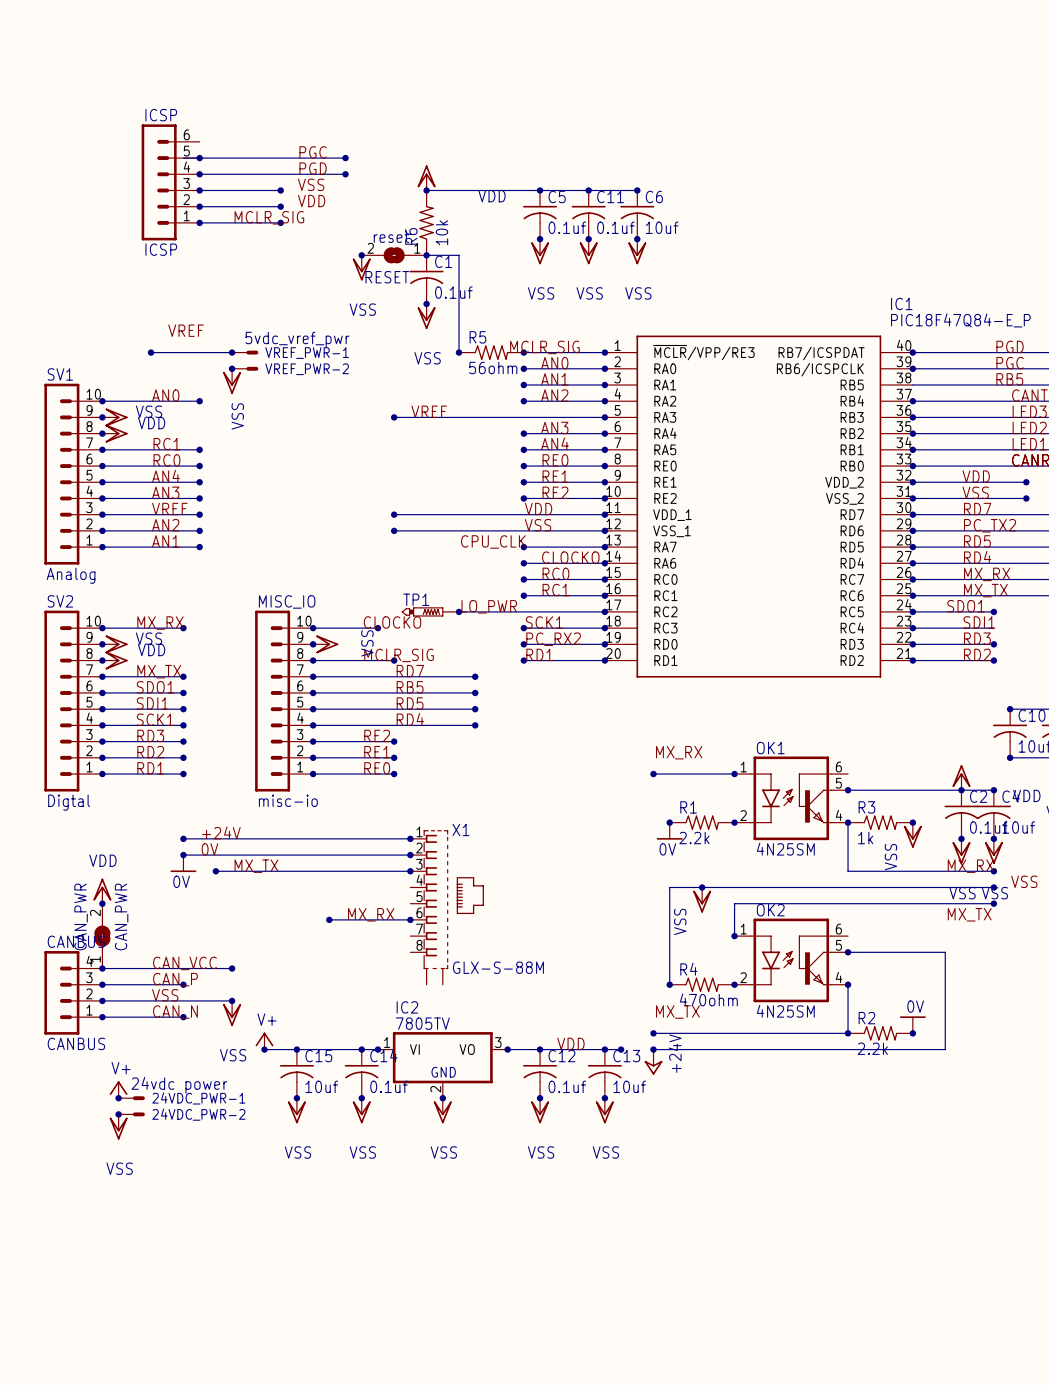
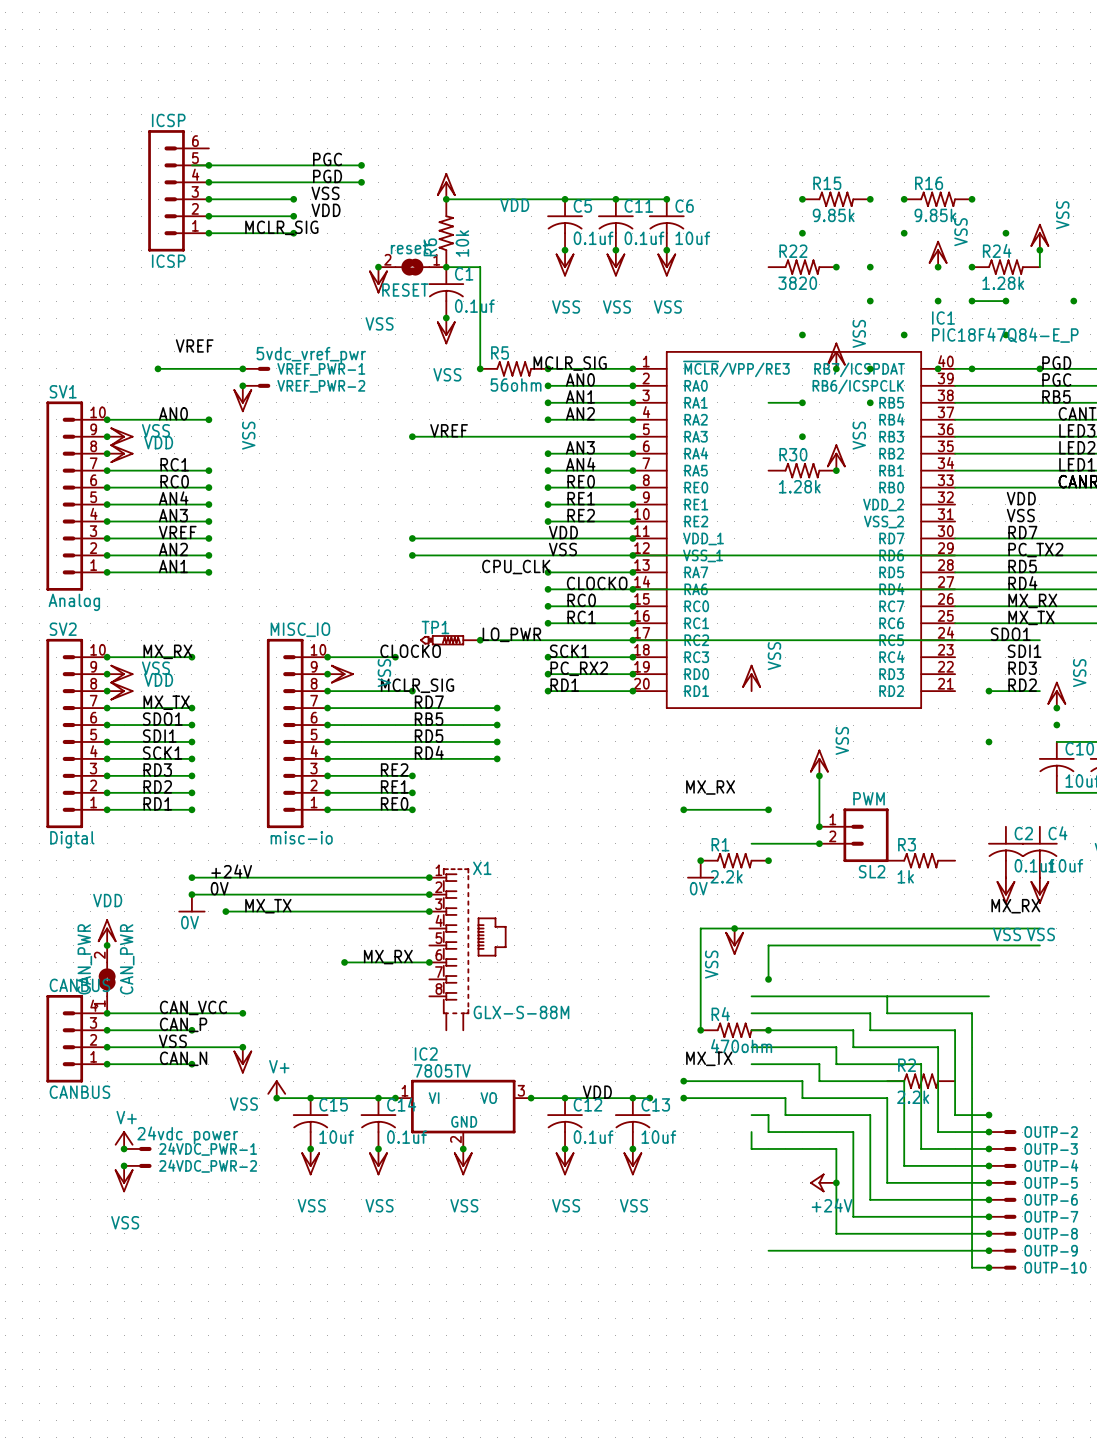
junction: none -> (802, 199)
R15: none -> 9.85k (836, 199)
junction: none -> (870, 199)
junction: none -> (904, 199)
R16: none -> 9.85k (938, 199)
junction: none -> (972, 199)
junction: none -> (802, 233)
junction: none -> (904, 233)
junction: none -> (1005, 233)
power symbol: none -> VSS (1039, 237)
wire: none -> (1039, 250) (1039, 267)
junction: none -> (1039, 250)
power symbol: none -> VSS (938, 253)
R22: none -> 3820 (802, 267)
junction: none -> (836, 267)
junction: none -> (870, 267)
junction: none -> (938, 267)
junction: none -> (972, 267)
R24: none -> 1.28k (1005, 267)
junction: none -> (870, 301)
junction: none -> (938, 301)
wire: none -> (972, 301) (1005, 301)
junction: none -> (972, 301)
junction: none -> (1005, 301)
junction: none -> (1073, 301)
junction: none -> (802, 334)
junction: none -> (904, 334)
junction: none -> (1005, 334)
power symbol: none -> VSS (836, 355)
junction: none -> (836, 368)
junction: none -> (870, 368)
junction: none -> (938, 368)
junction: (912, 352) -> none
junction: none -> (972, 368)
junction: none -> (1039, 368)
junction: (912, 368) -> none
wire: none -> (768, 402) (802, 402)
junction: none -> (802, 402)
junction: none -> (870, 402)
junction: (912, 401) -> none
junction: none -> (802, 436)
junction: (912, 417) -> none
junction: (912, 433) -> none
power symbol: none -> VSS (836, 457)
R30: none -> 1.28k (802, 470)
junction: none -> (836, 470)
junction: (912, 449) -> none
junction: (912, 466) -> none
wire: (912, 482) (1026, 482) -> none
junction: (912, 482) -> none
junction: (1026, 482) -> none
wire: (912, 498) (1026, 498) -> none
junction: (912, 498) -> none
junction: (1026, 498) -> none
junction: (912, 514) -> none
wire: none -> (632, 555) (955, 555)
junction: (912, 530) -> none
junction: (912, 547) -> none
wire: none -> (632, 589) (955, 589)
junction: (912, 563) -> none
junction: (912, 579) -> none
junction: (912, 595) -> none
wire: none -> (632, 640) (955, 640)
junction: (912, 611) -> none
junction: (993, 611) -> none
wire: (912, 628) (993, 628) -> none
junction: (912, 628) -> none
wire: (912, 644) (993, 644) -> none
junction: (912, 644) -> none
junction: (993, 644) -> none
power symbol: none -> VSS (751, 677)
wire: (912, 660) (945, 660) -> none
junction: (912, 660) -> none
junction: none -> (988, 691)
junction: (993, 660) -> none
power symbol: none -> VSS (1056, 694)
junction: none -> (1056, 708)
junction: none -> (1056, 725)
junction: none -> (988, 741)
junction: (1010, 709) -> none
power symbol: none -> VSS (819, 762)
wire: none -> (819, 775) (819, 826)
junction: none -> (819, 775)
junction: (1010, 757) -> none
power symbol: VDD (961, 777) -> none
junction: none -> (819, 826)
wire: (848, 790) (993, 790) -> none
junction: (848, 790) -> none
junction: (961, 790) -> none
junction: (993, 790) -> none
OK1: 4N25SM (791, 798) -> none
SL2: none -> PWM (854, 835)
wire: none -> (751, 843) (819, 843)
junction: none -> (819, 843)
wire: (848, 822) (848, 871) (993, 871) -> none
junction: (848, 822) -> none
junction: (912, 822) -> none
power symbol: VSS (912, 835) -> none
junction: (961, 838) -> none
junction: (993, 838) -> none
junction: (993, 871) -> none
label: VSS (1024, 881) -> none
junction: (993, 887) -> none
junction: (993, 903) -> none
label: MX_TX (969, 914) -> none
wire: none -> (751, 996) (887, 996) (887, 1013) (972, 1013) (972, 1267) (988, 1267)
junction: (848, 952) -> none
wire: (945, 952) (945, 1049) (848, 1049) -> (988, 1182) (887, 1182) (887, 1098)
OK2: 4N25SM (791, 960) -> none
wire: none -> (751, 1013) (870, 1013) (870, 1030) (955, 1030) (955, 1115) (988, 1115)
wire: none -> (751, 1030) (853, 1030) (853, 1047) (938, 1047) (938, 1132) (988, 1132)
wire: (848, 984) (848, 1033) -> (988, 1165) (904, 1165) (904, 1081) (887, 1081)
junction: (848, 984) -> none
wire: none -> (751, 1047) (836, 1047) (836, 1064) (921, 1064) (921, 1148) (988, 1148)
power symbol: 0V (912, 1024) -> none
wire: (766, 1033) (783, 1033) -> (751, 1064) (819, 1064) (819, 1081)
junction: (848, 1033) -> none
junction: (912, 1033) -> none
wire: (750, 1049) (766, 1049) -> (802, 1081) (802, 1098)
wire: none -> (785, 1098) (785, 1115) (870, 1115) (870, 1199) (988, 1199)
power symbol position: +24V (653, 1062) -> +24V (823, 1182)
wire: none -> (751, 1115) (768, 1115) (768, 1132) (853, 1132) (853, 1216) (988, 1216)
junction: none -> (988, 1115)
power symbol rotation: 0° (653, 1067) -> 90° clockwise (817, 1182)
wire: none -> (751, 1132) (751, 1148) (836, 1148) (836, 1233) (988, 1233)
junction: none -> (988, 1132)
OUTP-2: none -> (1002, 1132)
junction: none -> (988, 1148)
OUTP-3: none -> (1002, 1148)
junction: none -> (988, 1165)
OUTP-4: none -> (1002, 1165)
junction: none -> (836, 1182)
junction: none -> (988, 1182)
OUTP-5: none -> (1002, 1182)
junction: none -> (988, 1199)
OUTP-6: none -> (1002, 1199)
junction: none -> (988, 1216)
OUTP-7: none -> (1002, 1216)
junction: none -> (988, 1233)
OUTP-8: none -> (1002, 1233)
wire: none -> (768, 1250) (988, 1250)
junction: none -> (988, 1250)
OUTP-9: none -> (1002, 1250)
junction: none -> (988, 1267)
OUTP-10: none -> (1002, 1267)

